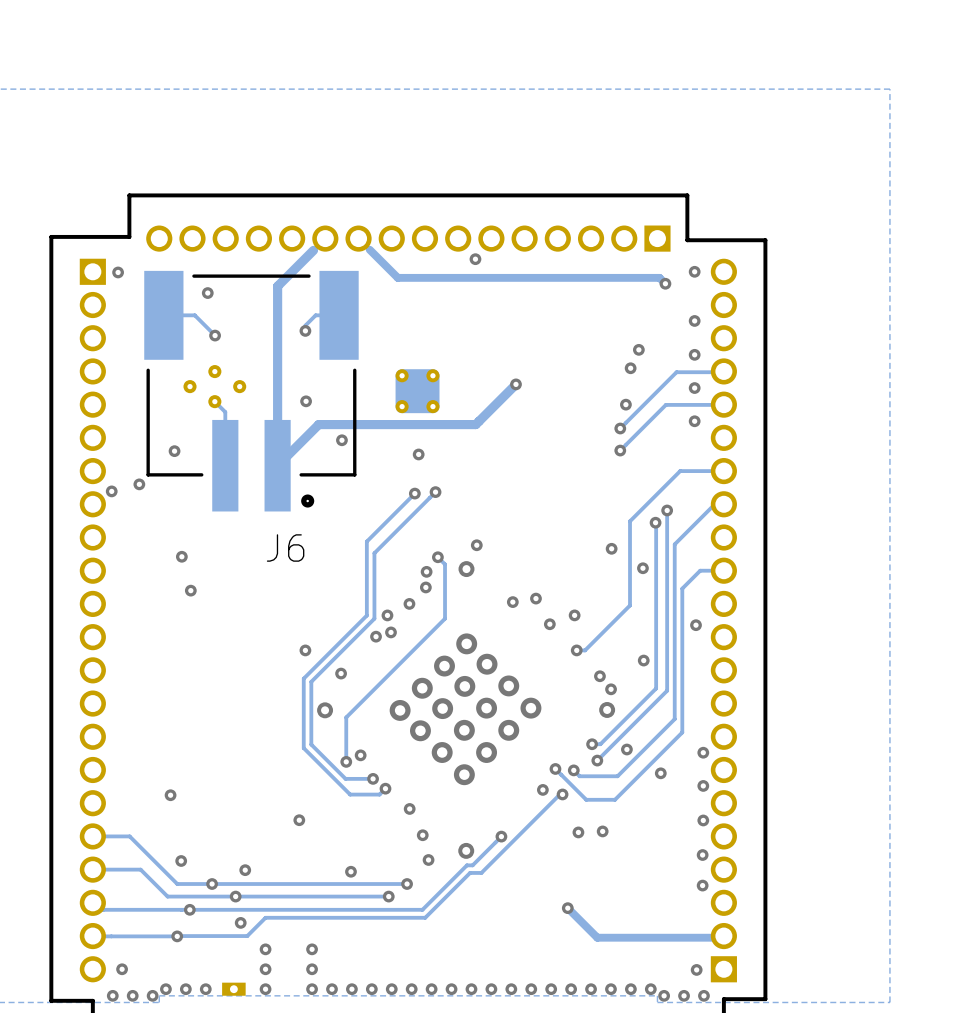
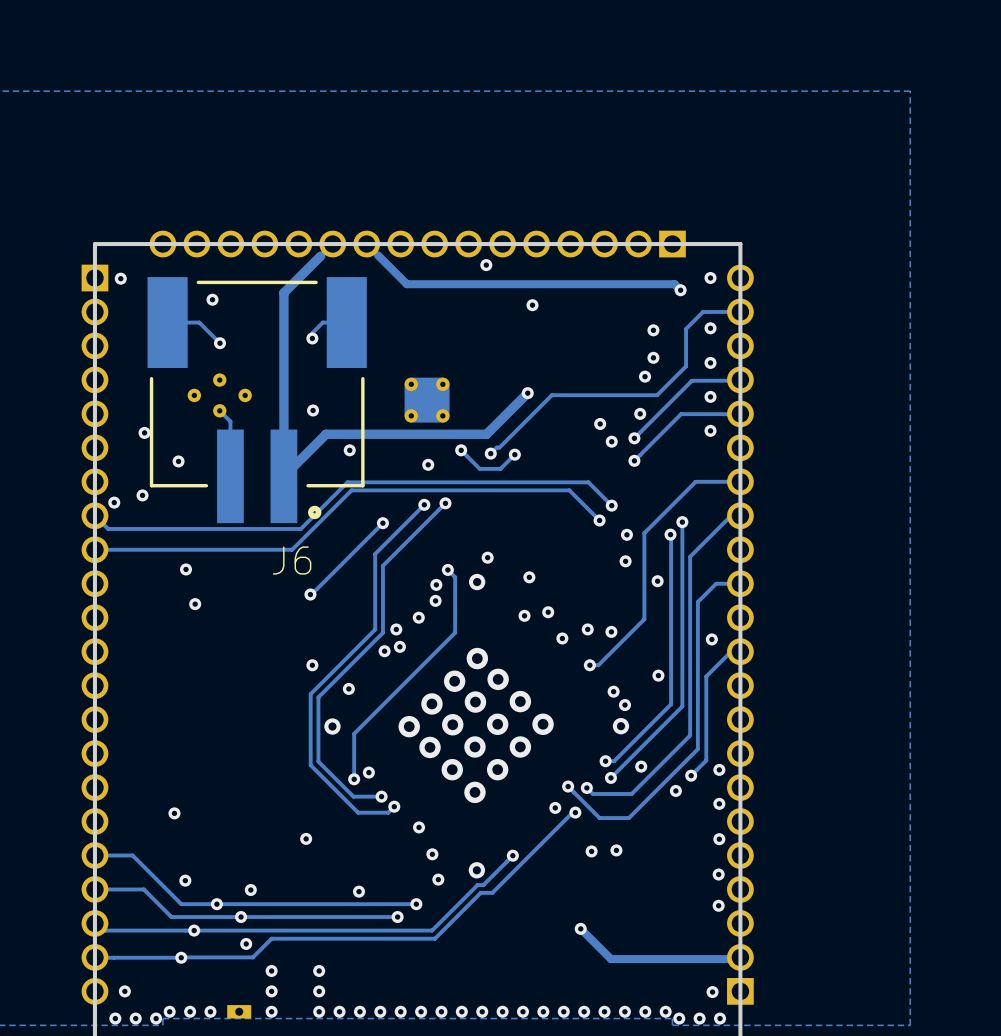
via: none -> (532, 305)
track: none -> (731, 311) (703, 311) (686, 328) (686, 366) (657, 395) (551, 395) (499, 447) (496, 447) (490, 453) (494, 453)
via: none -> (653, 330)
via: none -> (600, 423)
via: none -> (144, 432)
via: none -> (611, 441)
track: none -> (461, 450) (479, 468) (500, 468) (514, 454)
via: none -> (461, 450)
via: none -> (490, 453)
via: none -> (514, 454)
track: none -> (611, 505) (588, 482) (347, 482) (300, 528) (108, 528) (104, 525)
via: none -> (611, 505)
track: none -> (599, 520) (569, 490) (351, 490) (292, 549) (104, 549)
via: none -> (599, 520)
track: none -> (382, 523) (310, 594)
via: none -> (382, 523)
via: none -> (626, 534)
via: none -> (529, 577)
via: none -> (310, 594)
via: none -> (611, 631)
track: none -> (731, 651) (706, 676) (706, 760) (691, 775)
via: none -> (691, 775)
board edge: (723, 999) (765, 999) (765, 240) (687, 240) (687, 195) (129, 195) (129, 236) (51, 236) (51, 1000) (92, 1000) -> (740, 1021) (740, 244) (94, 244) (94, 1023)

